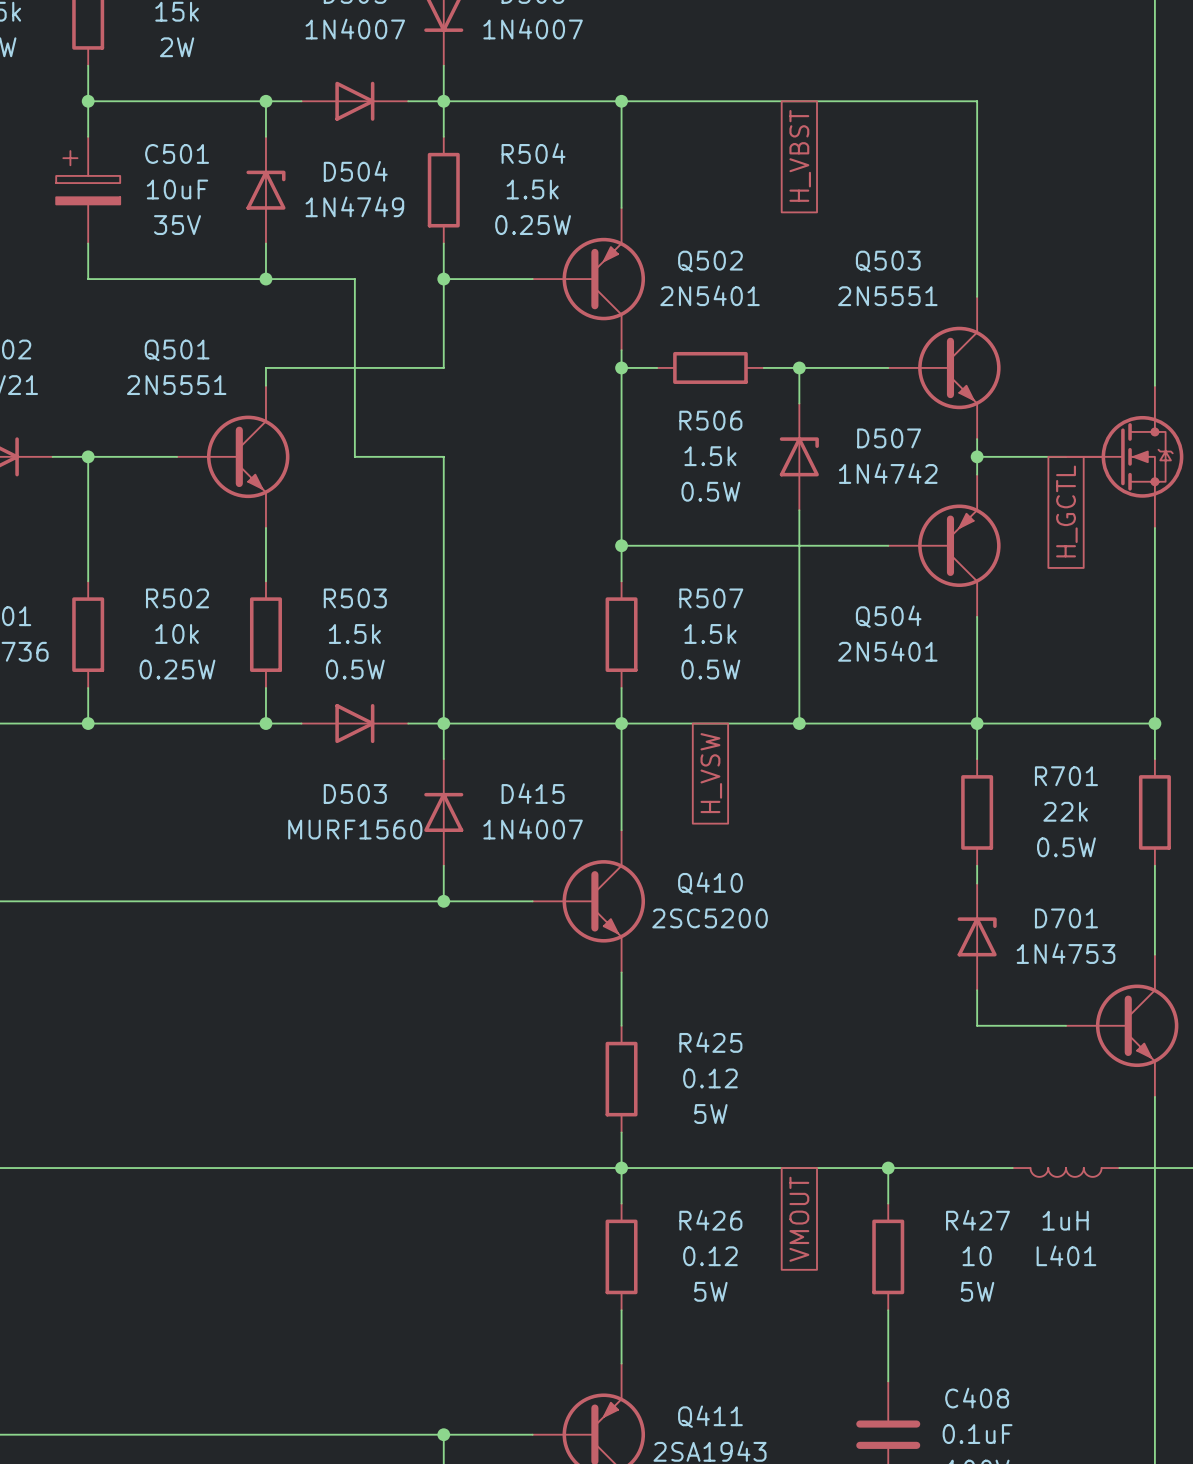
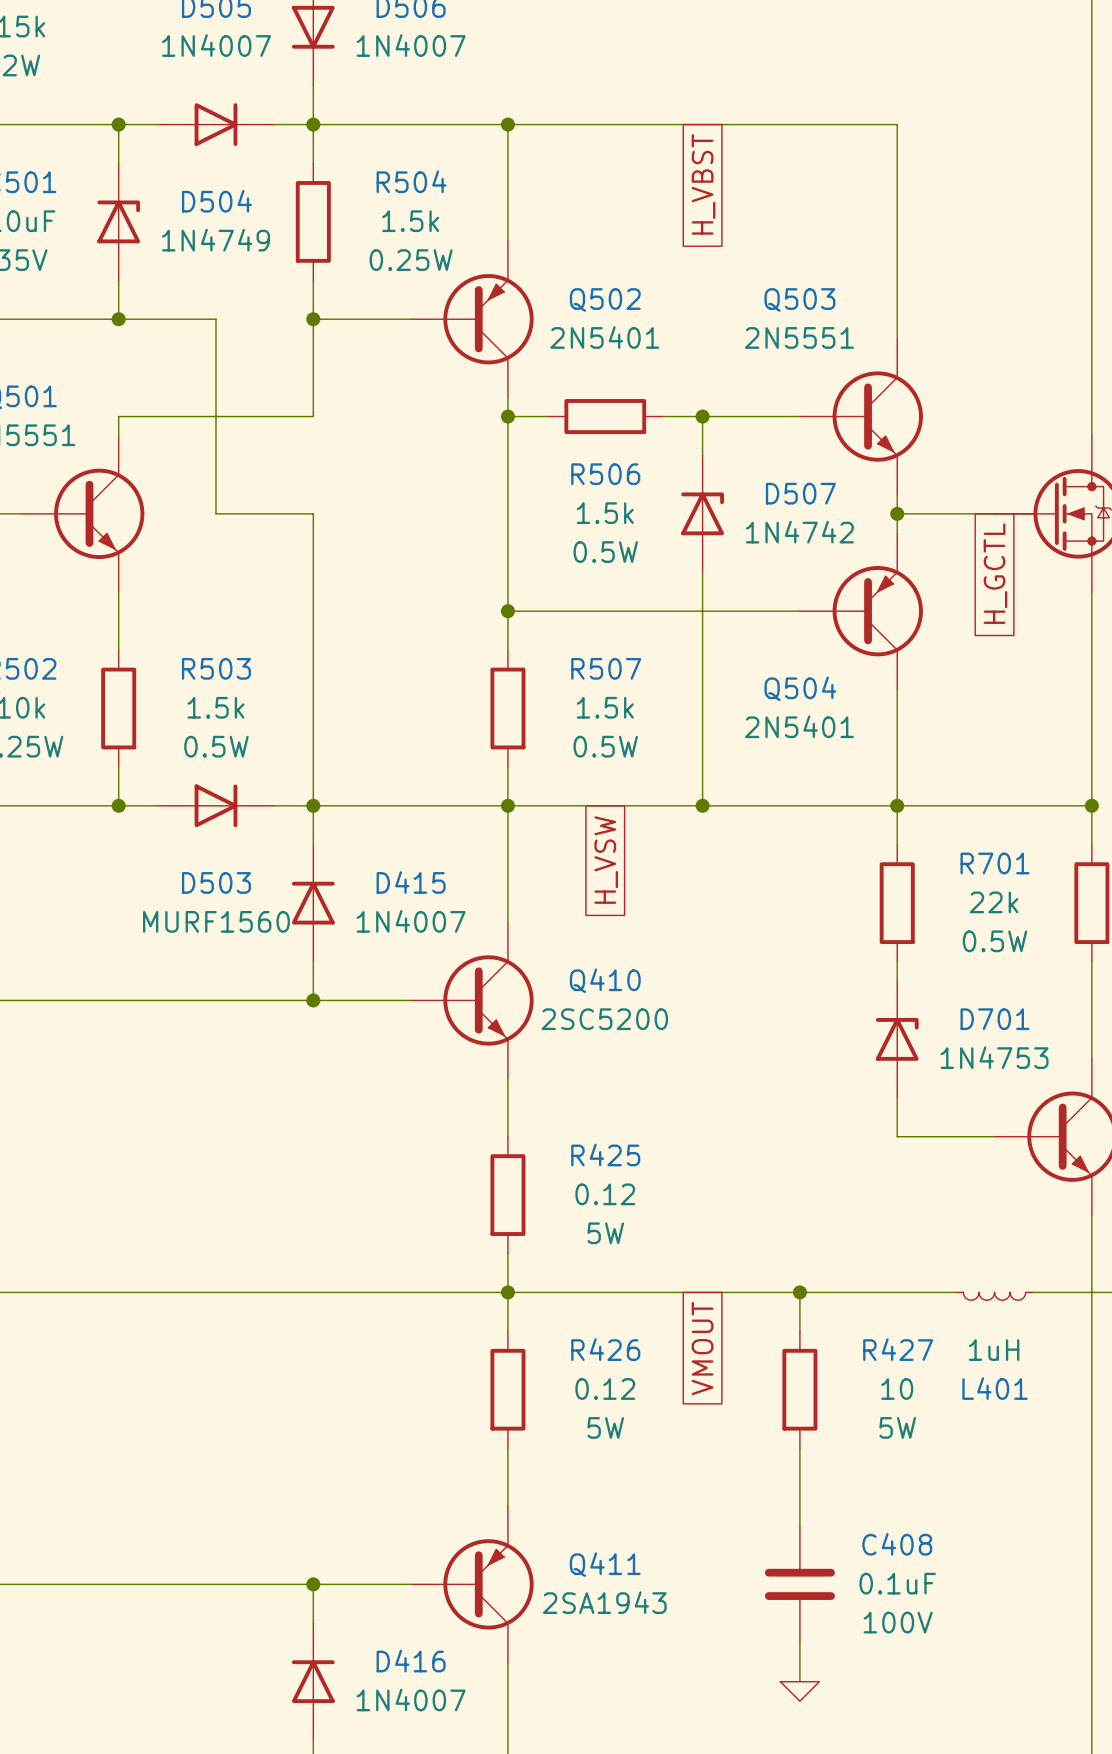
L401 symbol: [1012, 1168, 1120, 1177] -> [955, 1292, 1034, 1301]

